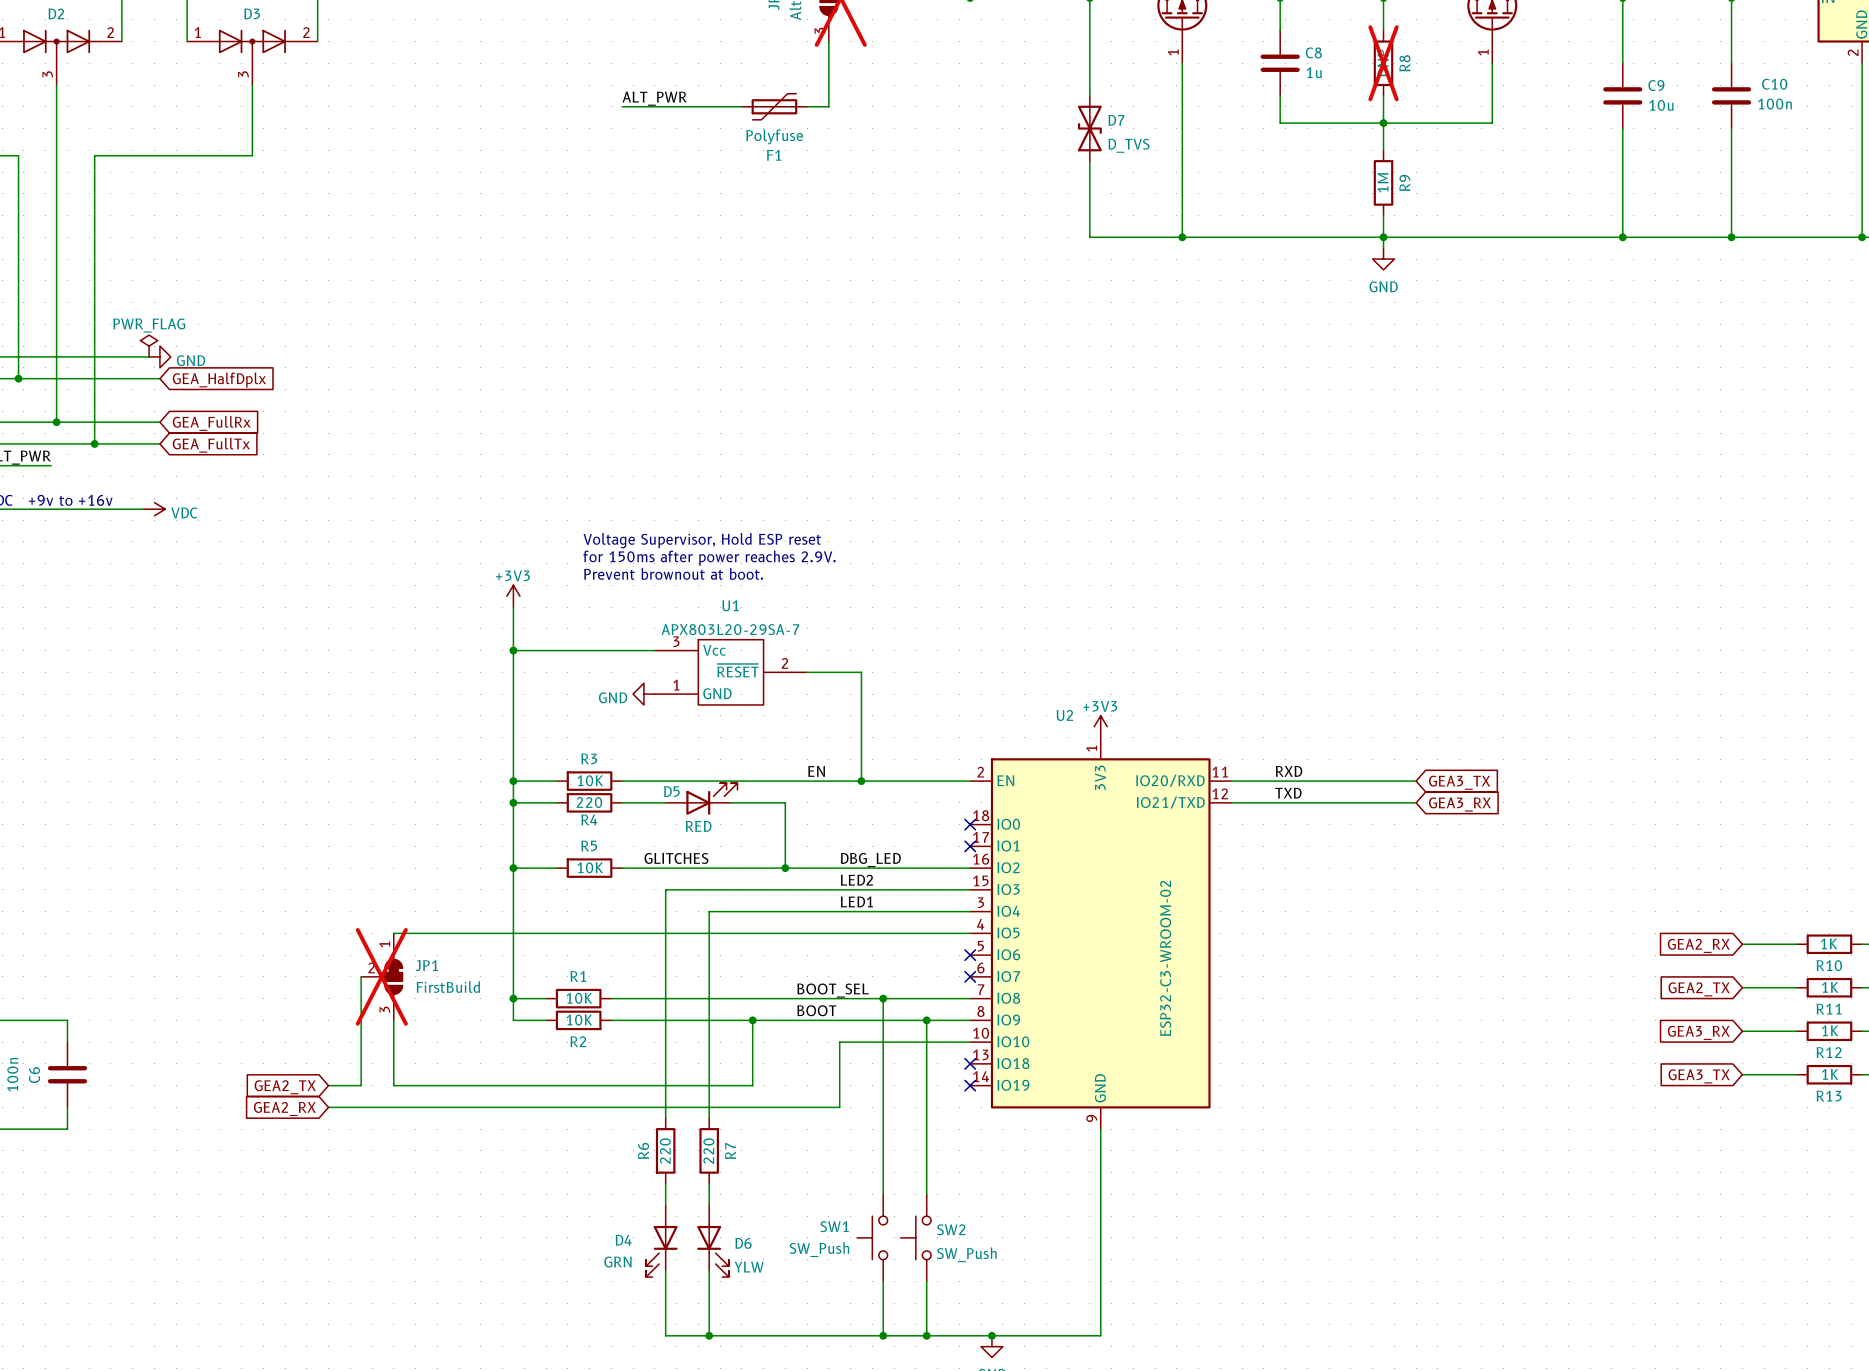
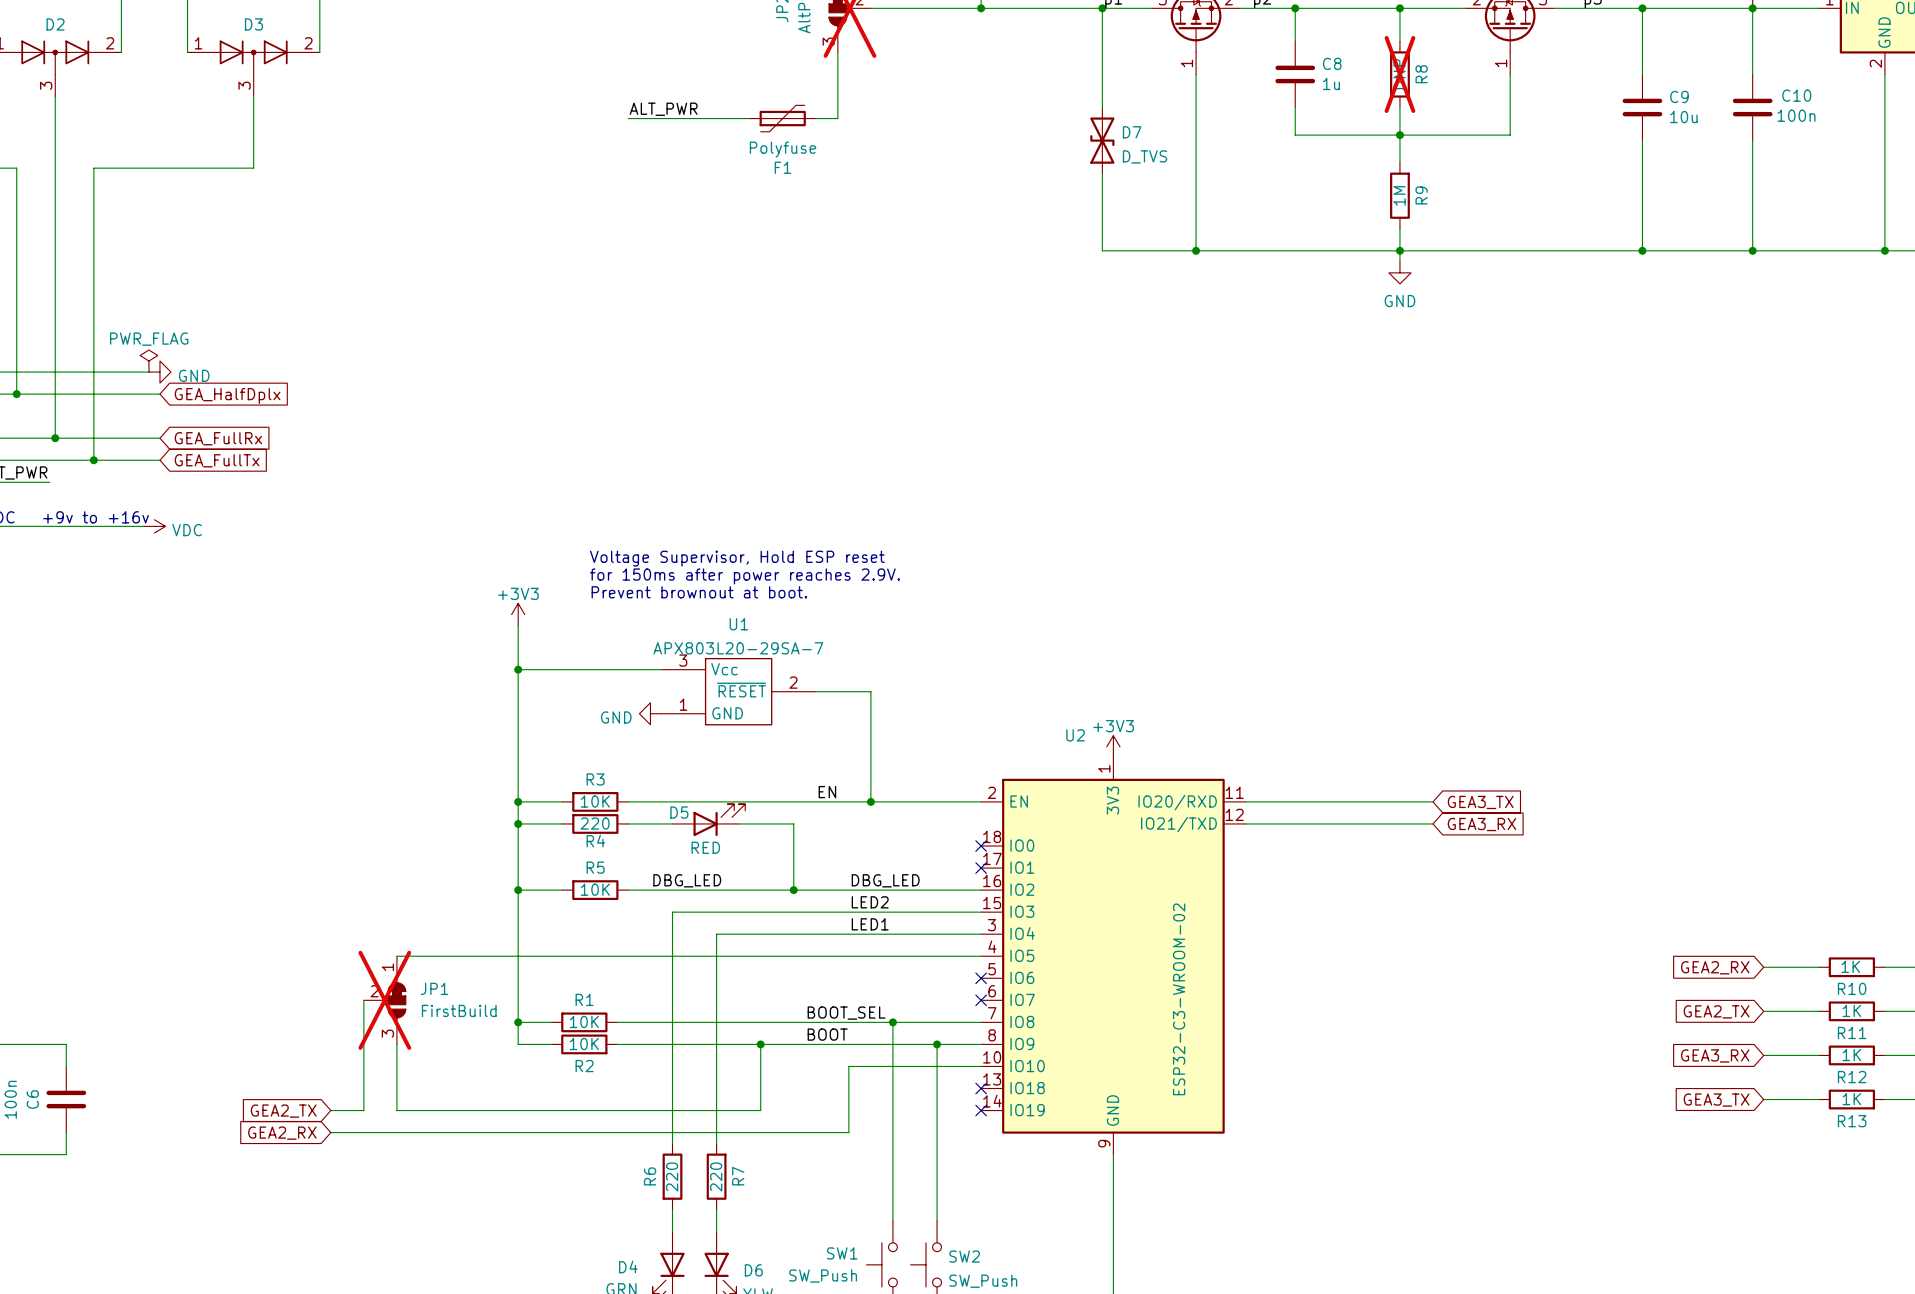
label: RXD (1289, 771) -> none
label: TXD (1288, 793) -> none
label: GLITCHES (676, 858) -> DBG_LED (687, 880)

